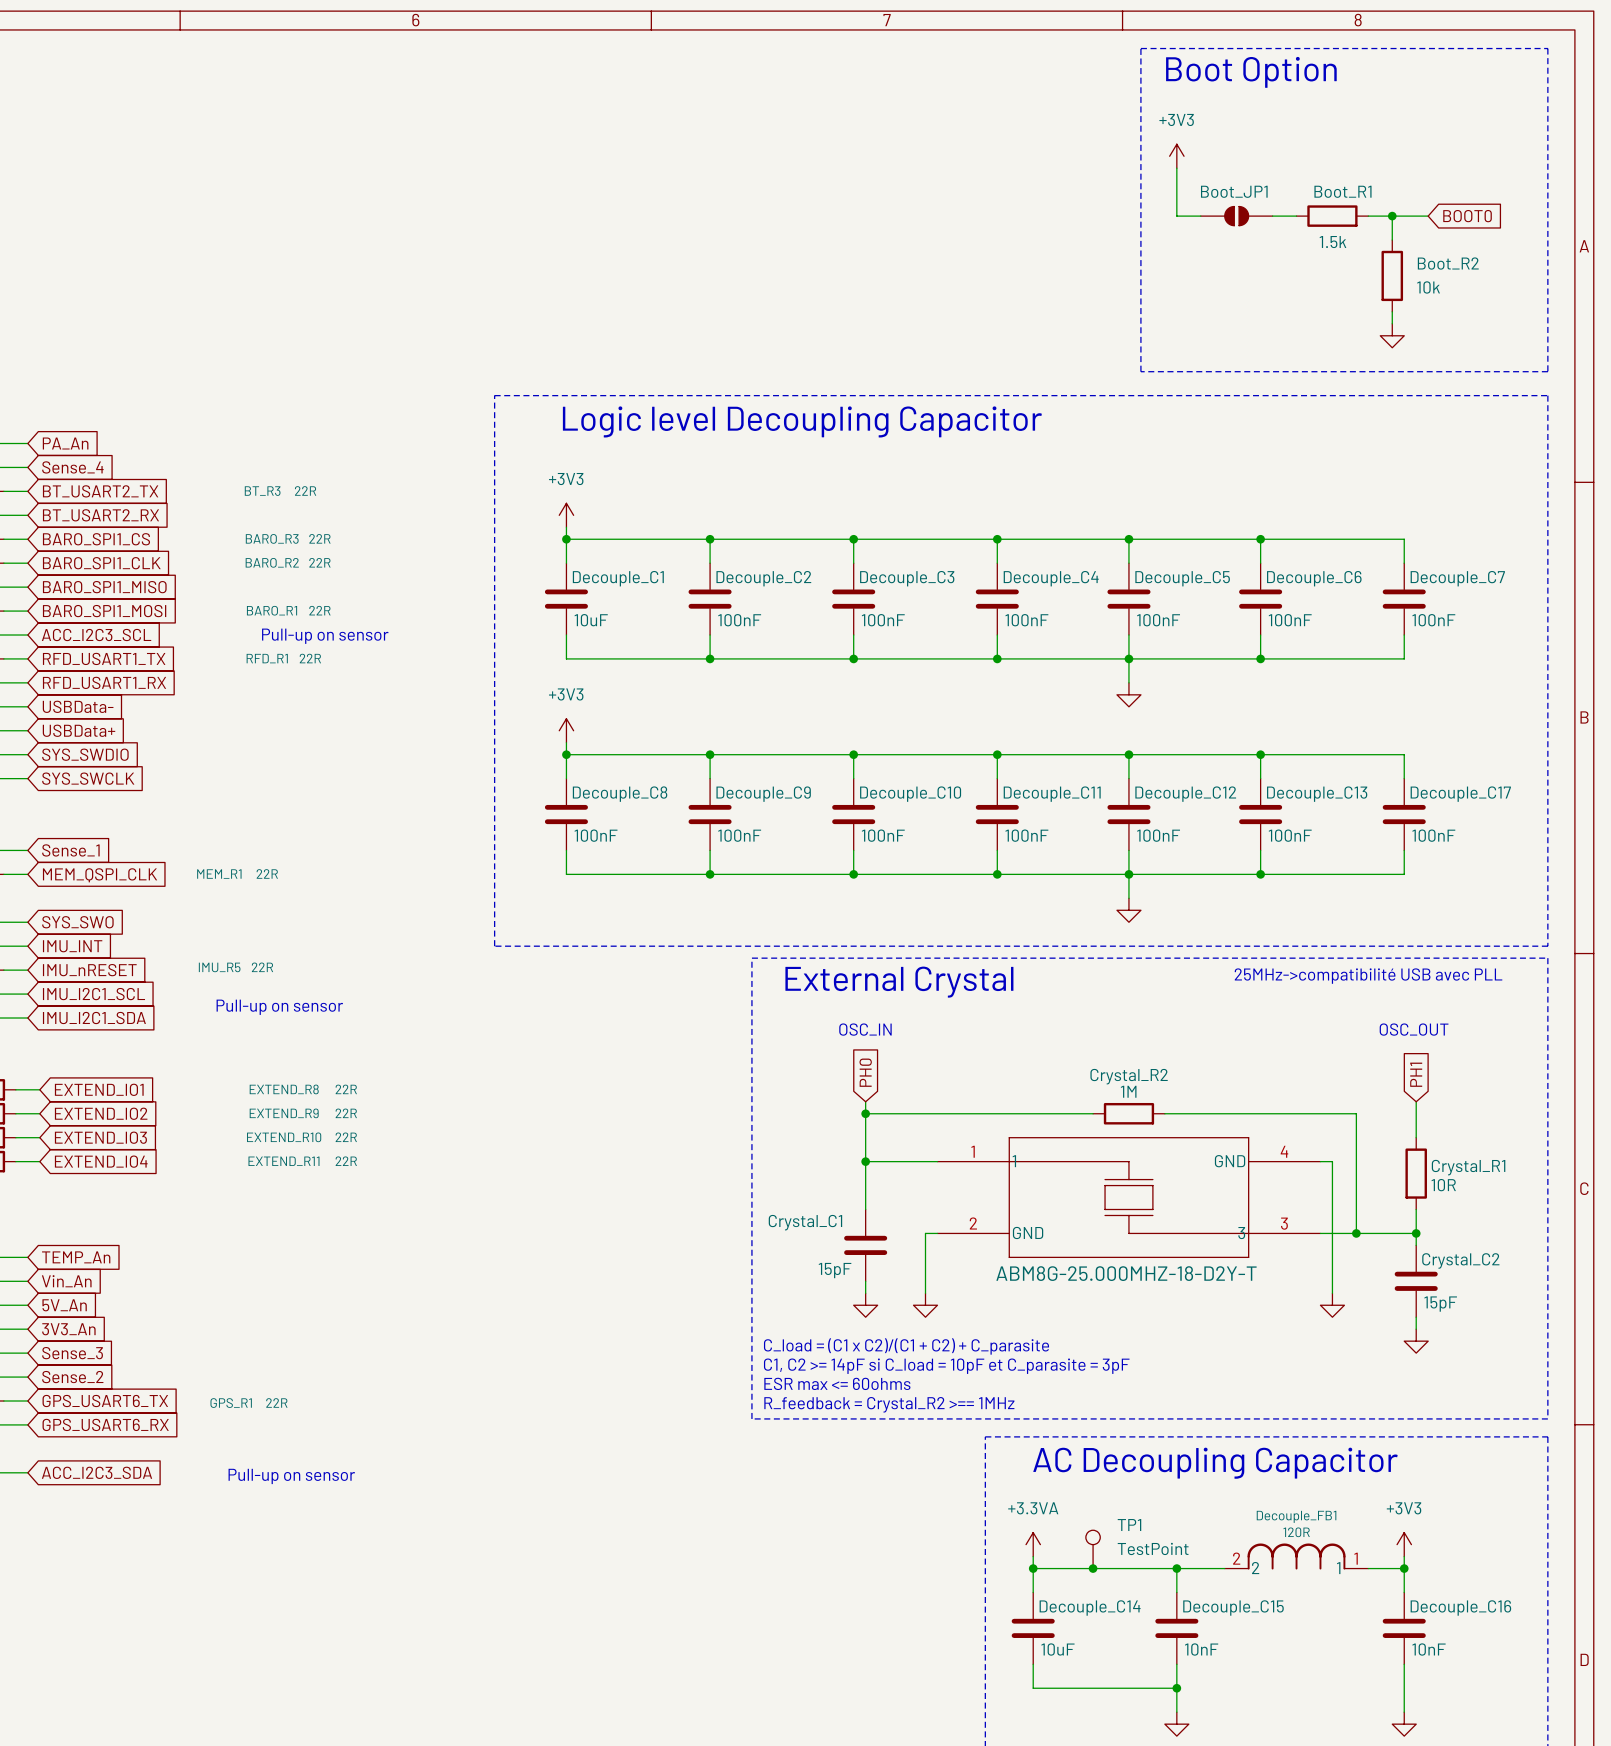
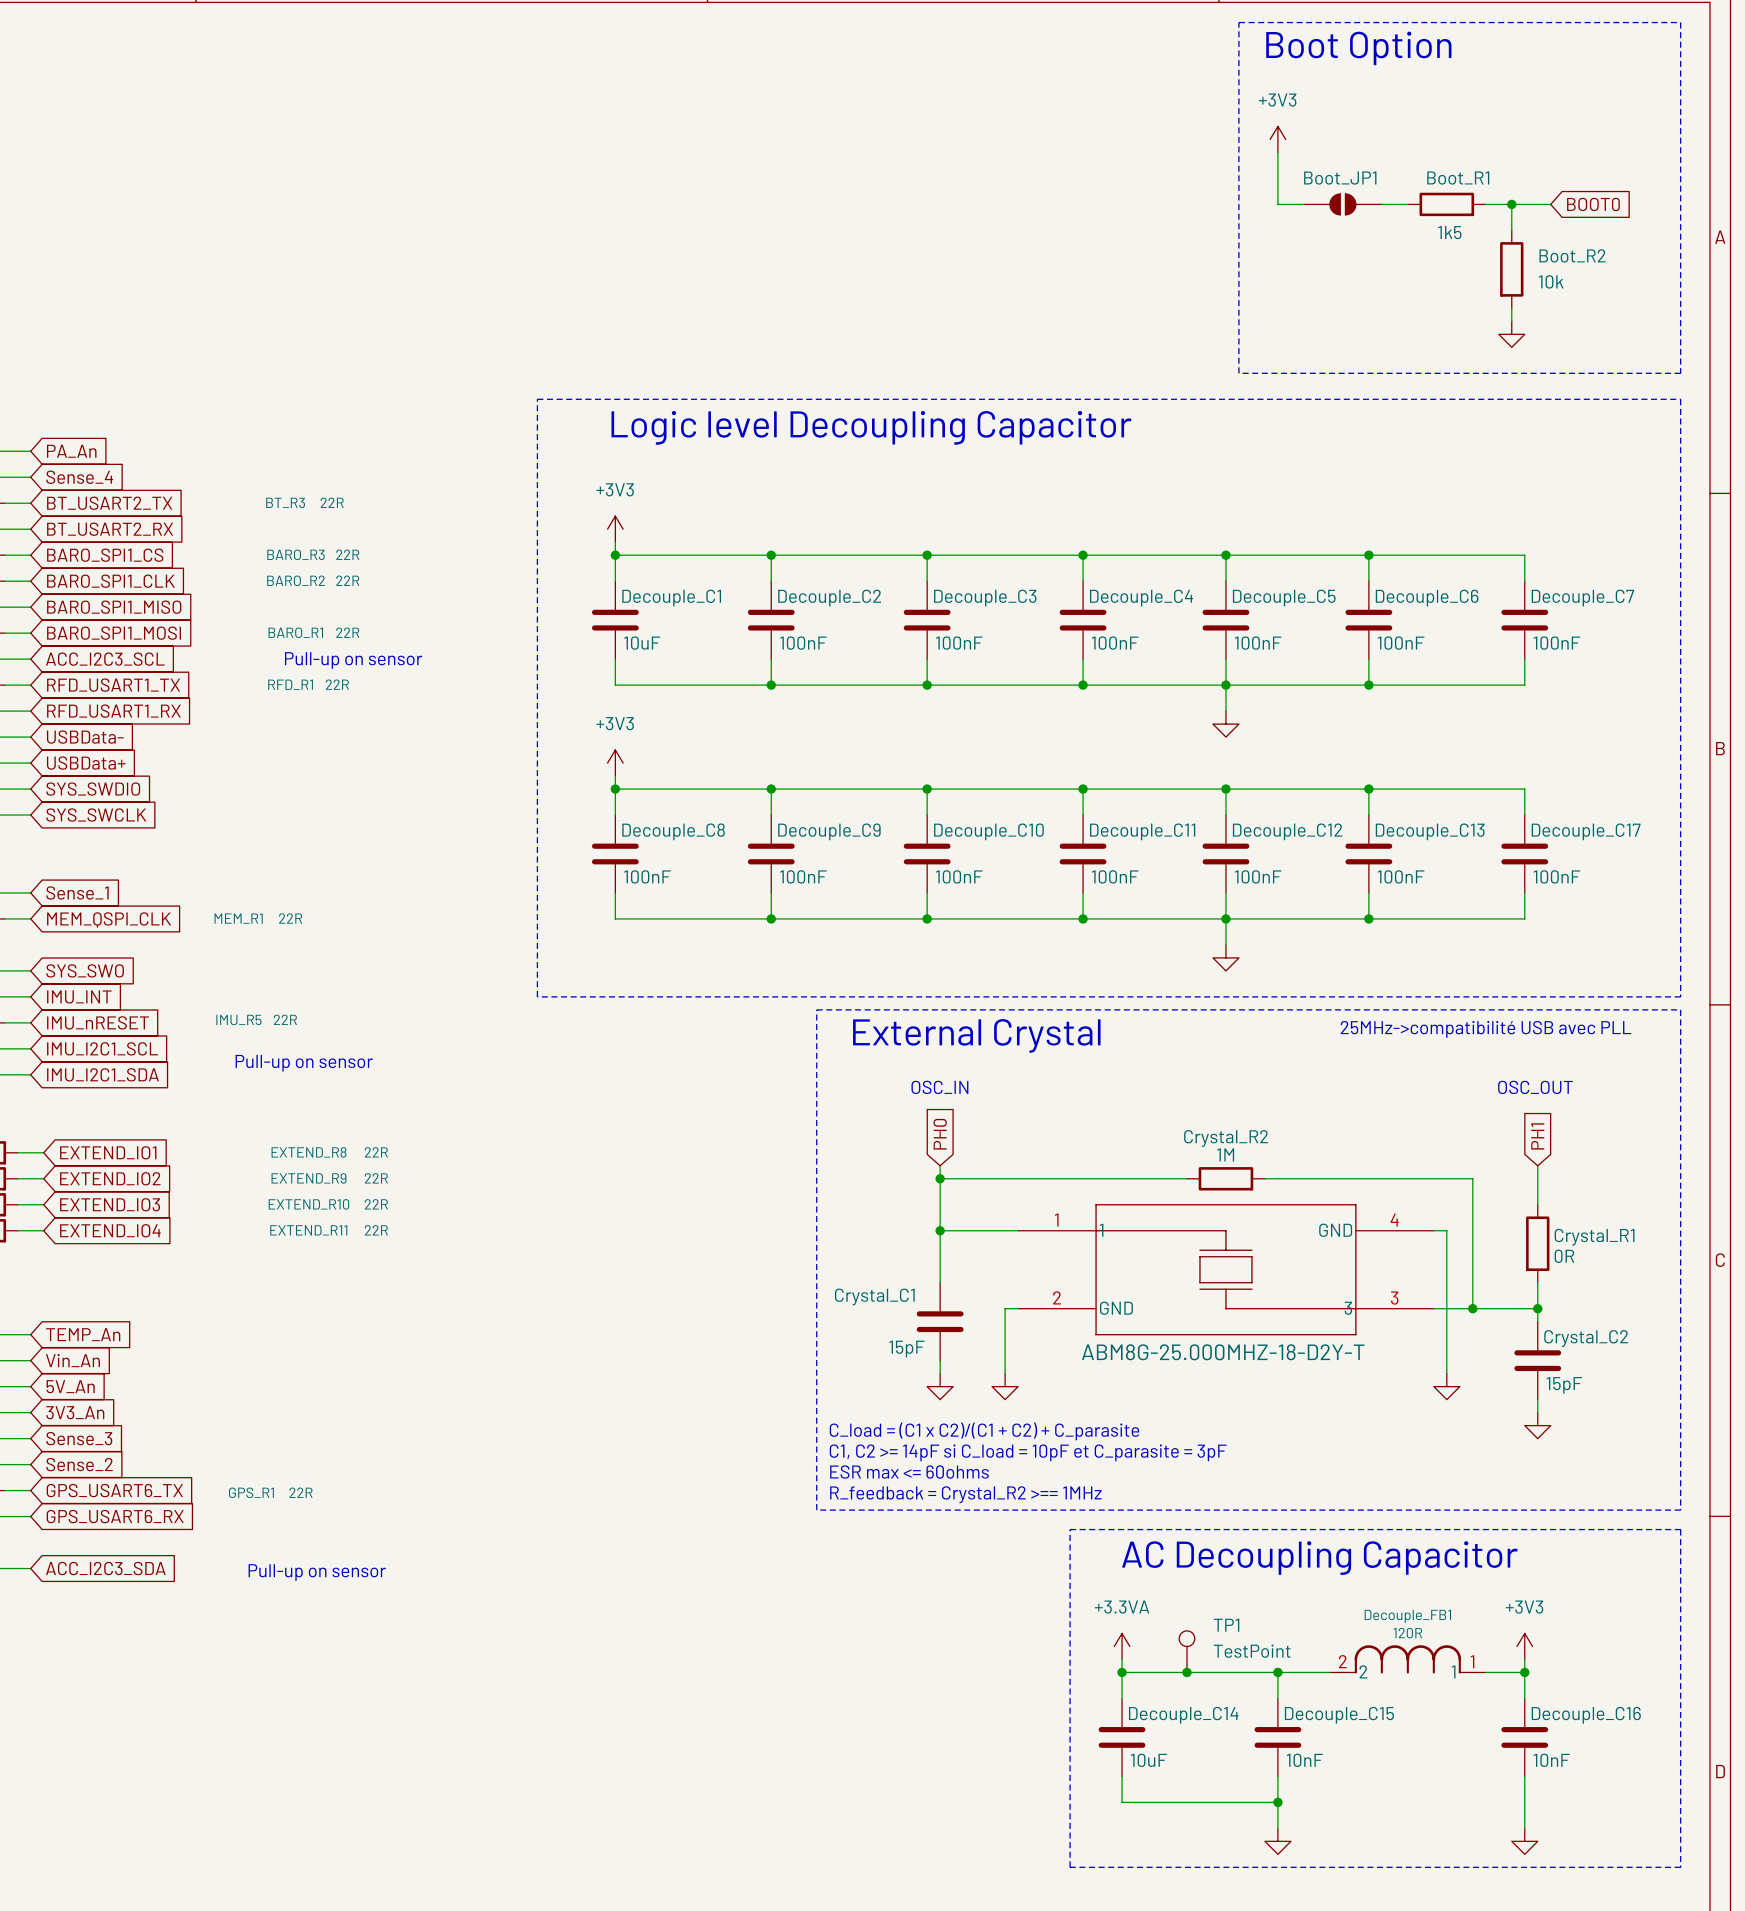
Boot_R1 value: 1.5k (1332, 242) -> 1k5 (1449, 232)
Crystal_R1 value: 10R (1443, 1185) -> 0R (1564, 1256)

